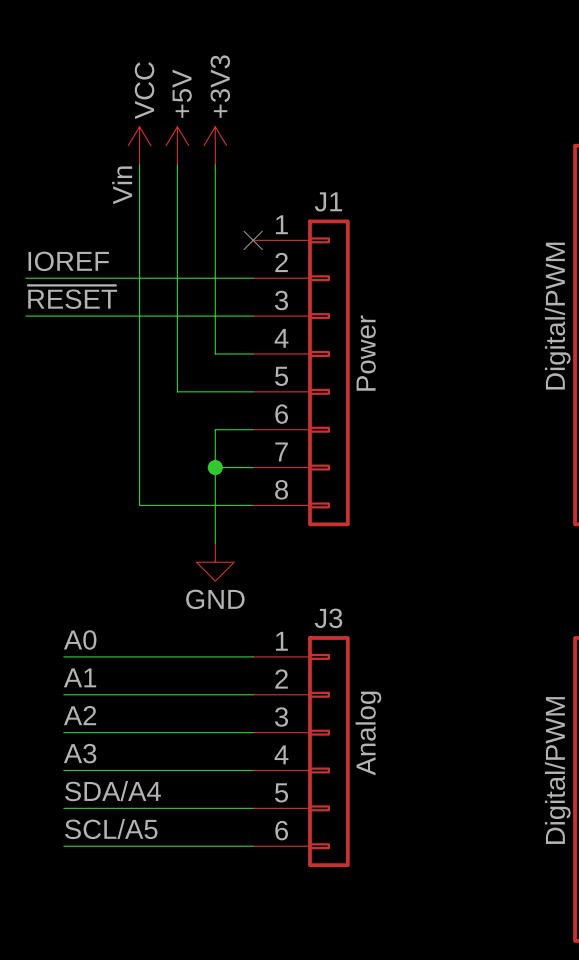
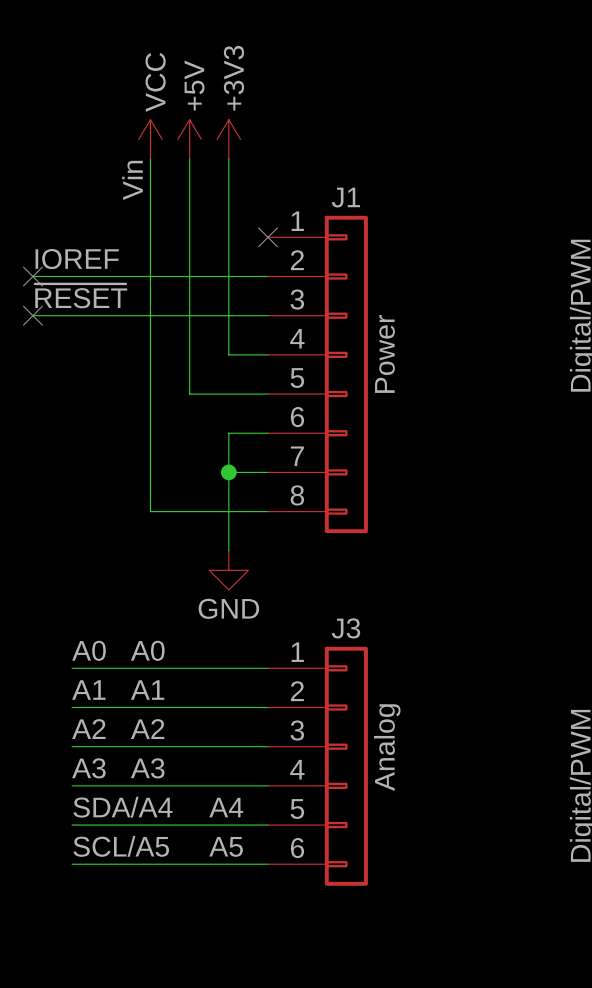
no-connect mark: none -> (32, 276)
no-connect mark: none -> (32, 315)
label: none -> A0 (147, 650)
label: none -> A1 (147, 690)
label: none -> A2 (147, 729)
label: none -> A3 (147, 768)
label: none -> A4 (226, 807)
label: none -> A5 (226, 846)

